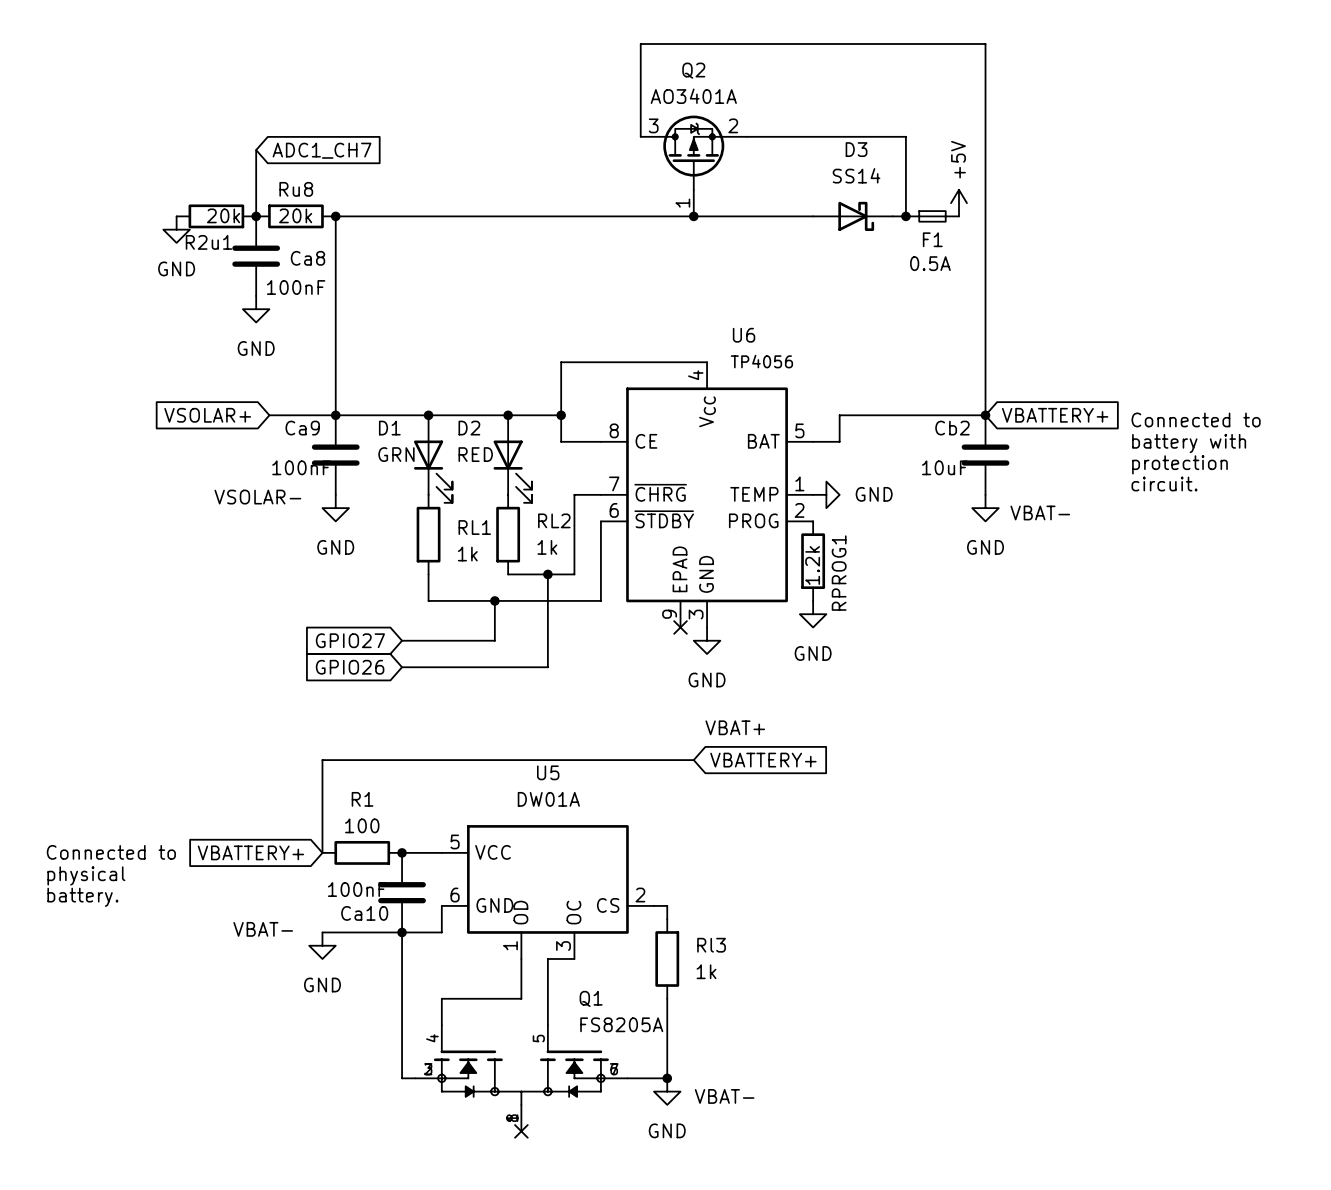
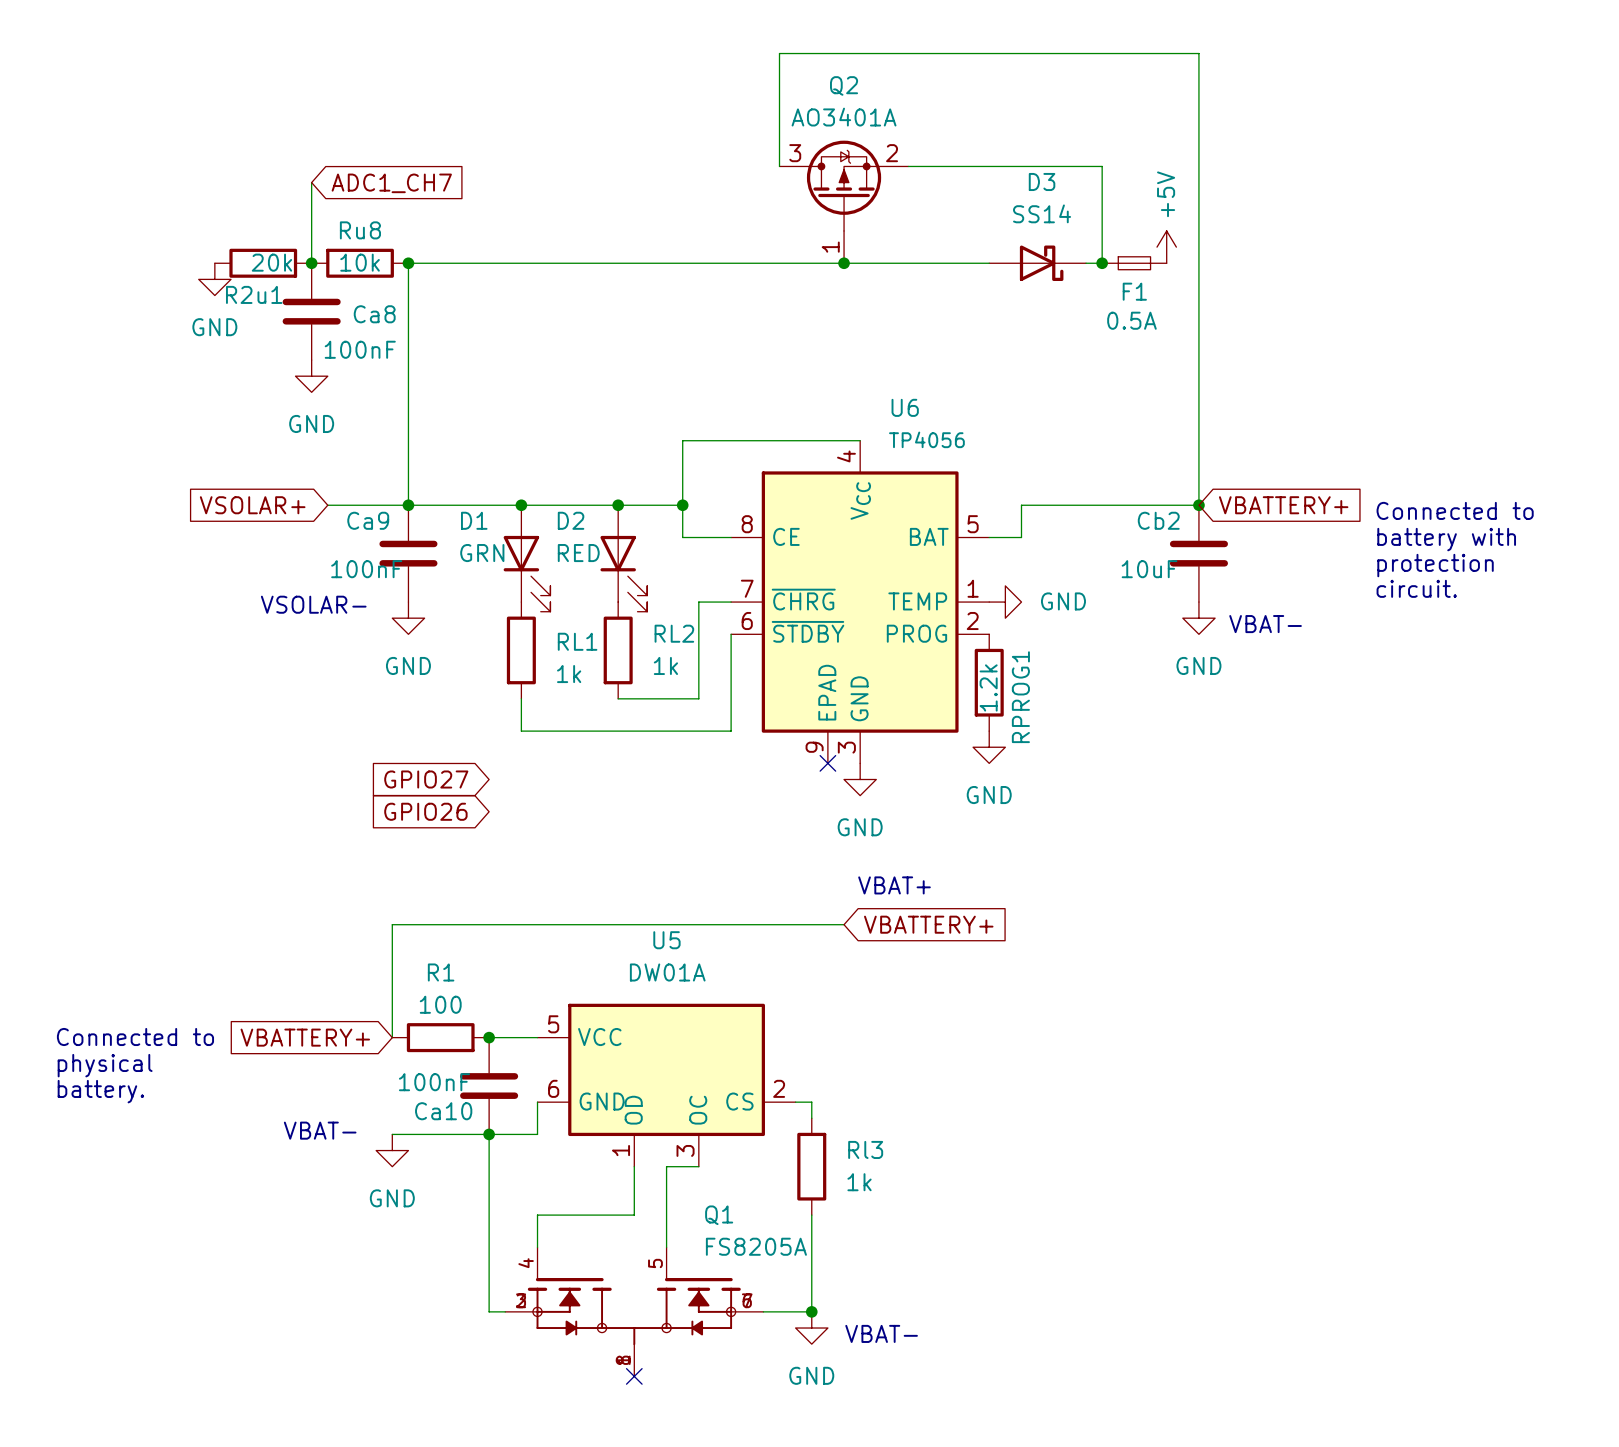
Ru8 value: 20k (295, 215) -> 10k (360, 262)
wire: (547, 574) (547, 667) (402, 667) -> none
junction: (547, 574) -> none
wire: (494, 600) (494, 640) (402, 640) -> none
junction: (494, 600) -> none

